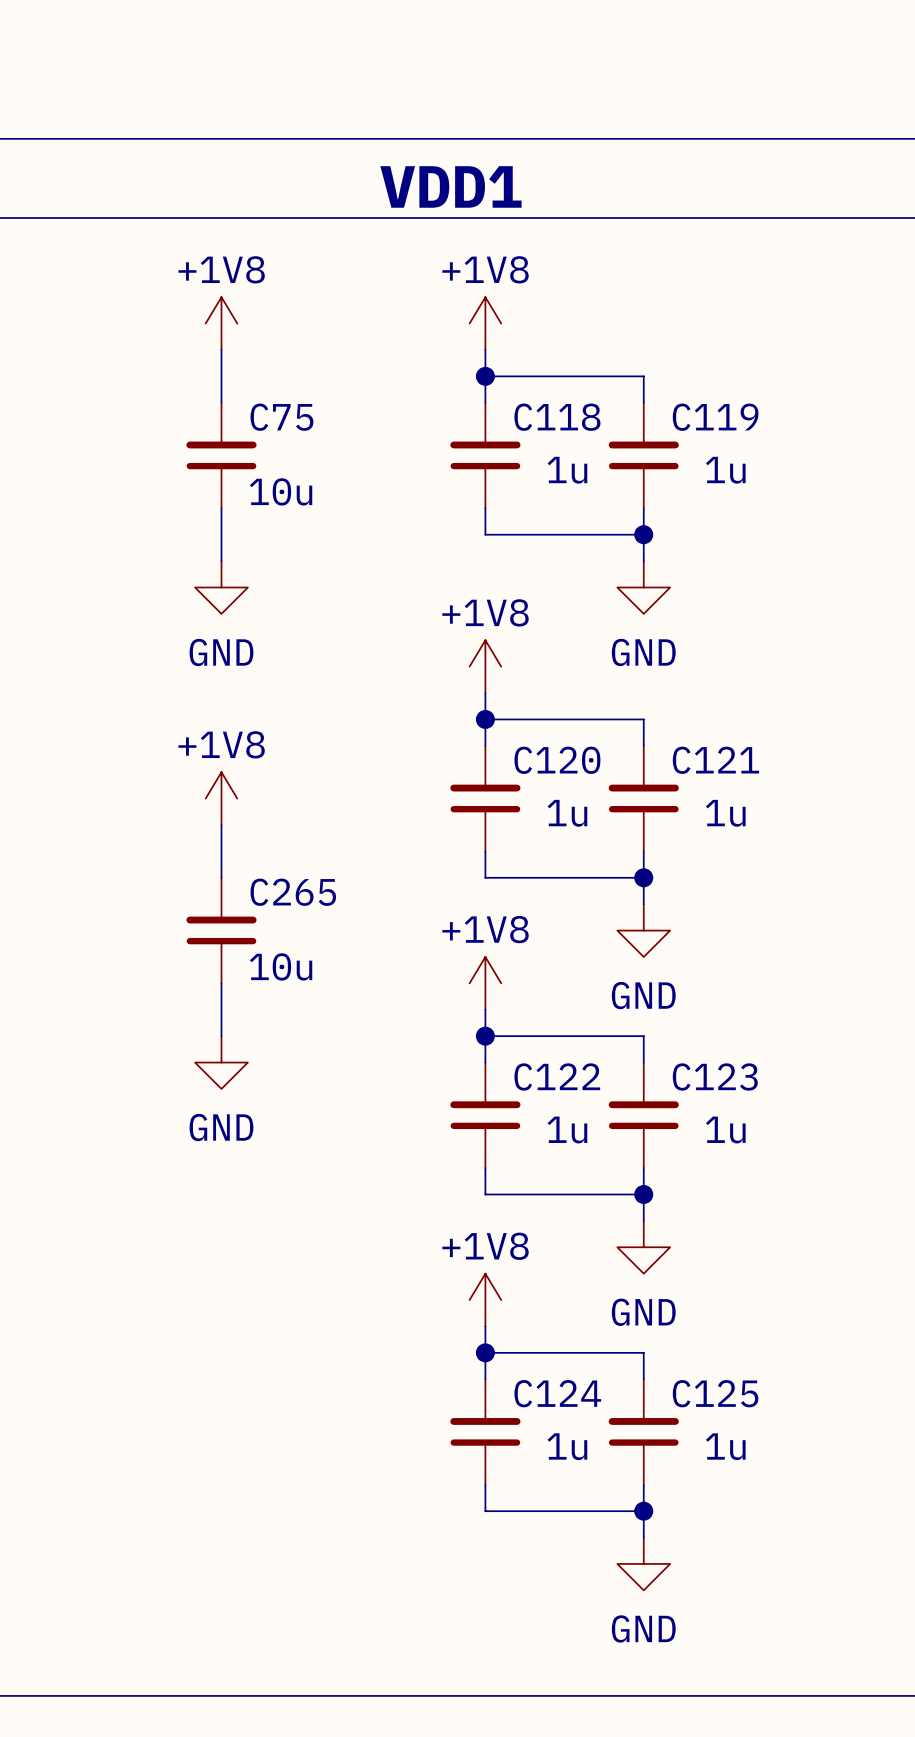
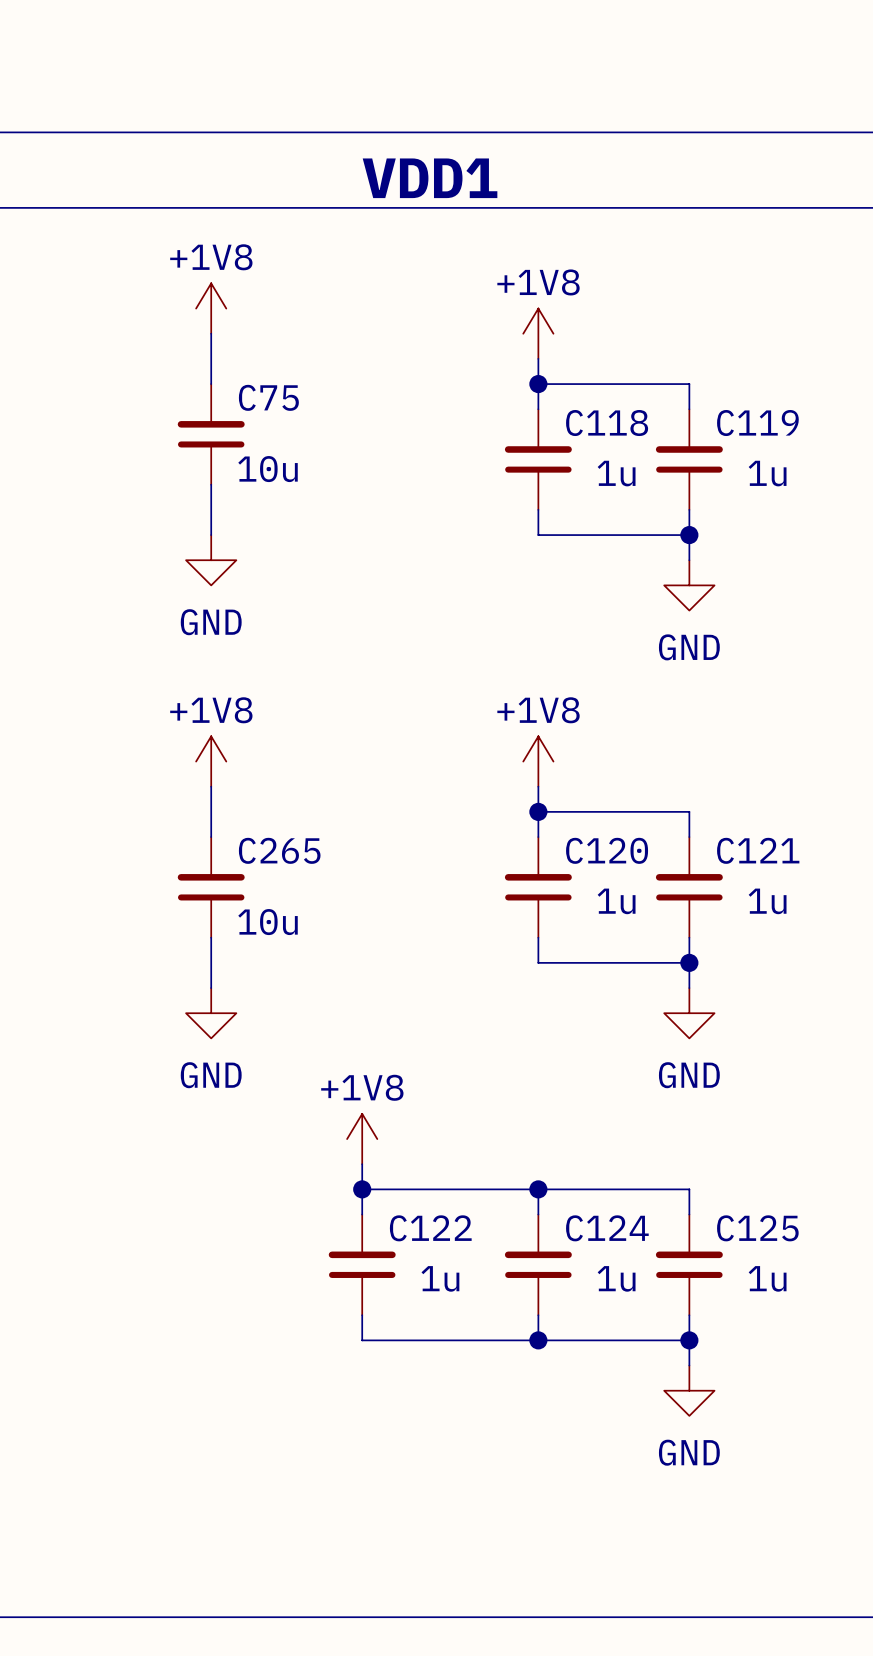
power symbol position: +1V8 (485, 323) -> +1V8 (538, 333)
wire: (485, 349) (485, 402) -> (538, 358) (538, 409)
wire: (485, 376) (643, 376) (643, 402) -> (538, 384) (689, 384) (689, 409)
junction: (485, 376) -> none
junction: none -> (538, 384)
C118 position: (485, 455) -> (538, 459)
C119 position: (643, 455) -> (689, 459)
wire: (485, 508) (485, 534) (643, 534) -> (538, 509) (538, 535) (689, 535)
wire: (643, 508) (643, 561) -> (689, 509) (689, 560)
junction: (643, 534) -> none
junction: none -> (689, 535)
power symbol position: GND (643, 587) -> GND (689, 585)
power symbol: +1V8 (485, 666) -> none
wire: (485, 693) (485, 745) -> (538, 786) (538, 837)
wire: (485, 719) (643, 719) (643, 745) -> (538, 811) (689, 811) (689, 837)
junction: (485, 719) -> none
C120 position: (485, 798) -> (538, 887)
power symbol: none -> +1V8 (538, 761)
C121 position: (643, 798) -> (689, 887)
wire: (485, 851) (485, 877) (643, 877) -> (538, 937) (538, 962) (689, 962)
junction: none -> (538, 811)
wire: (643, 851) (643, 904) -> (689, 937) (689, 988)
junction: (643, 877) -> none
power symbol: GND (643, 930) -> none
power symbol: +1V8 (485, 983) -> none
wire: (485, 1009) (485, 1062) -> none
junction: none -> (689, 962)
wire: (485, 1036) (643, 1036) (643, 1062) -> none
junction: (485, 1036) -> none
power symbol: none -> GND (689, 1013)
C122 position: (485, 1115) -> (362, 1264)
C123: (643, 1115) -> none
wire: (485, 1168) (485, 1194) (643, 1194) -> none
wire: (643, 1168) (643, 1220) -> none
power symbol: none -> +1V8 (362, 1139)
junction: (643, 1194) -> none
wire: none -> (362, 1189) (689, 1189) (689, 1214)
junction: none -> (362, 1189)
wire: none -> (538, 1189) (538, 1214)
junction: none -> (538, 1189)
power symbol: GND (643, 1247) -> none
power symbol: +1V8 (485, 1300) -> none
wire: (485, 1326) (485, 1379) -> (362, 1164) (362, 1214)
wire: (485, 1352) (643, 1352) (643, 1379) -> none
junction: (485, 1352) -> none
wire: none -> (362, 1315) (362, 1340) (689, 1340)
wire: none -> (538, 1315) (538, 1340)
junction: none -> (538, 1340)
junction: none -> (689, 1340)
C124 position: (485, 1432) -> (538, 1264)
C125 position: (643, 1432) -> (689, 1264)
power symbol: none -> GND (689, 1390)
wire: (485, 1484) (485, 1511) (643, 1511) -> none
wire: (643, 1484) (643, 1537) -> (689, 1315) (689, 1365)
junction: (643, 1511) -> none
power symbol: GND (643, 1563) -> none

